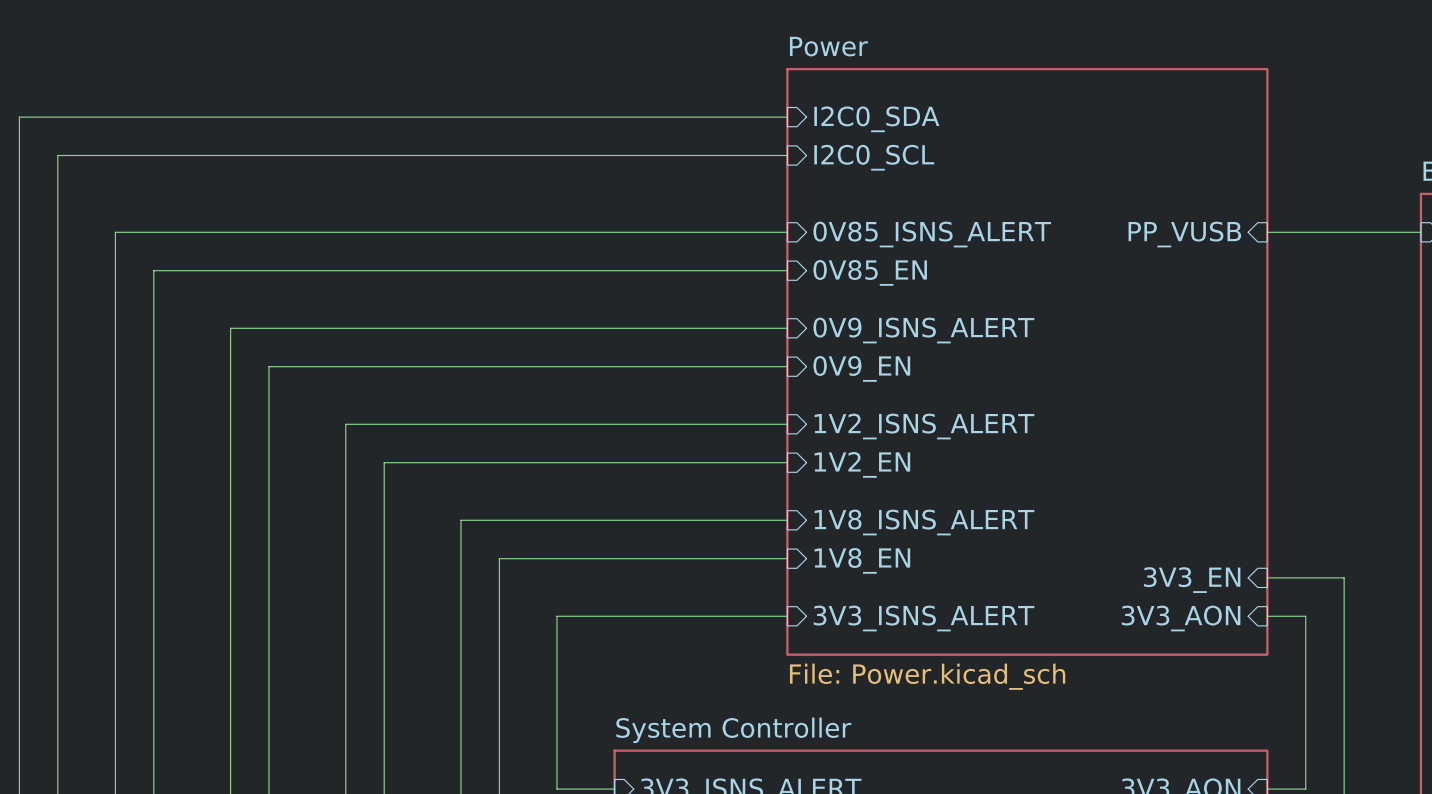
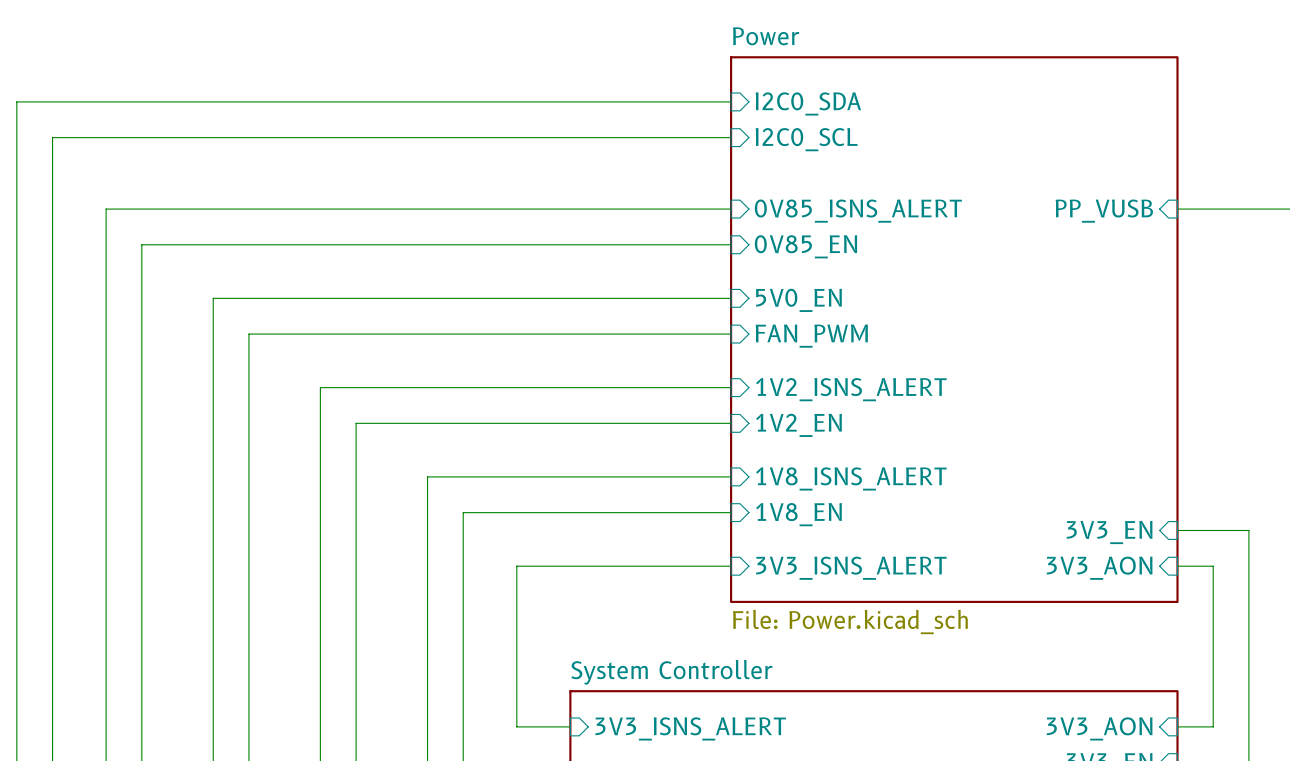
sheet pin: 0V9_ISNS_ALERT (923, 330) -> 5V0_EN (798, 300)
sheet pin: 0V9_EN (861, 368) -> FAN_PWM (811, 336)

